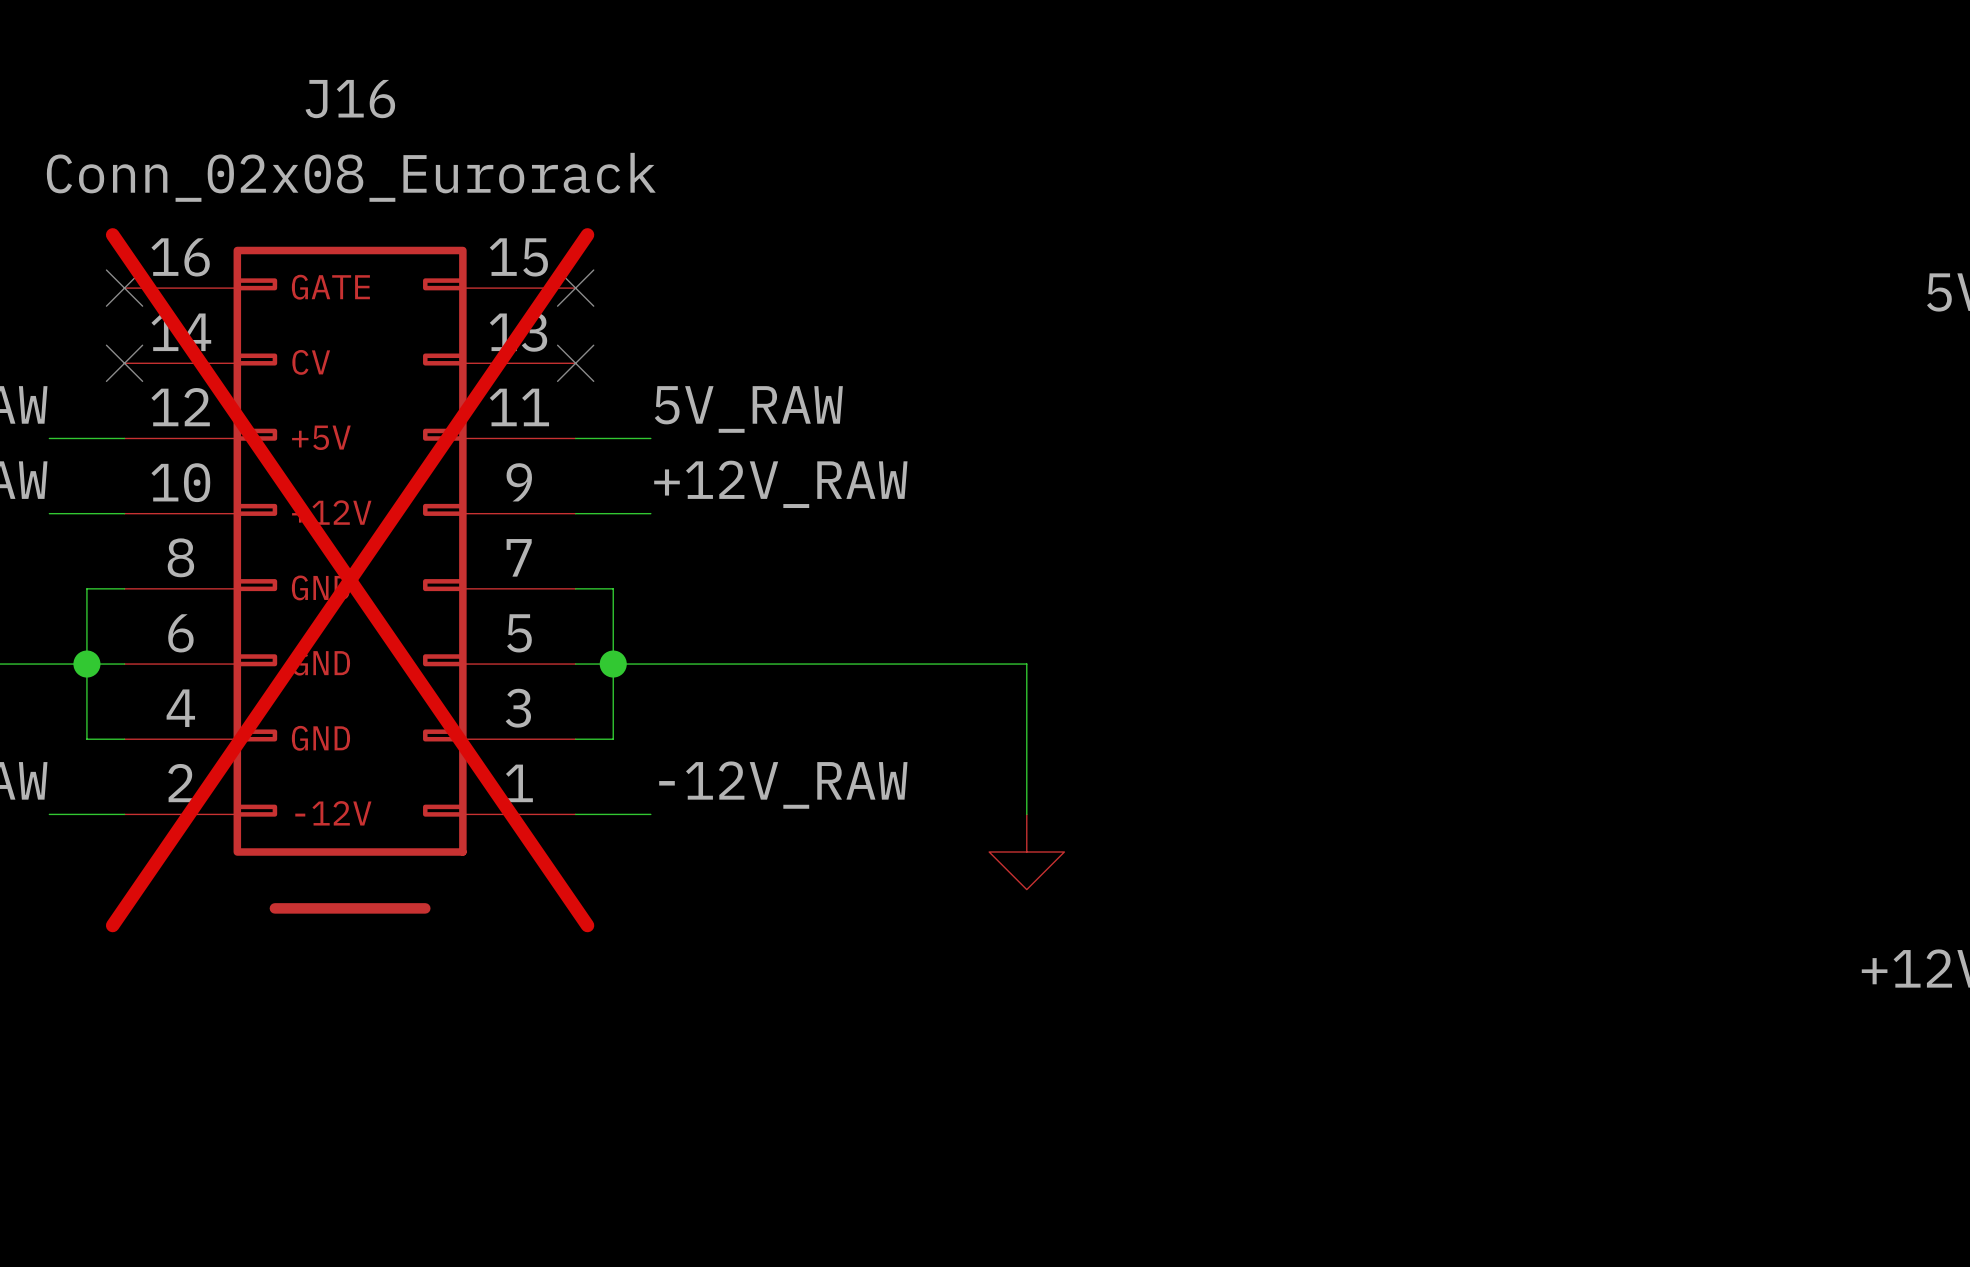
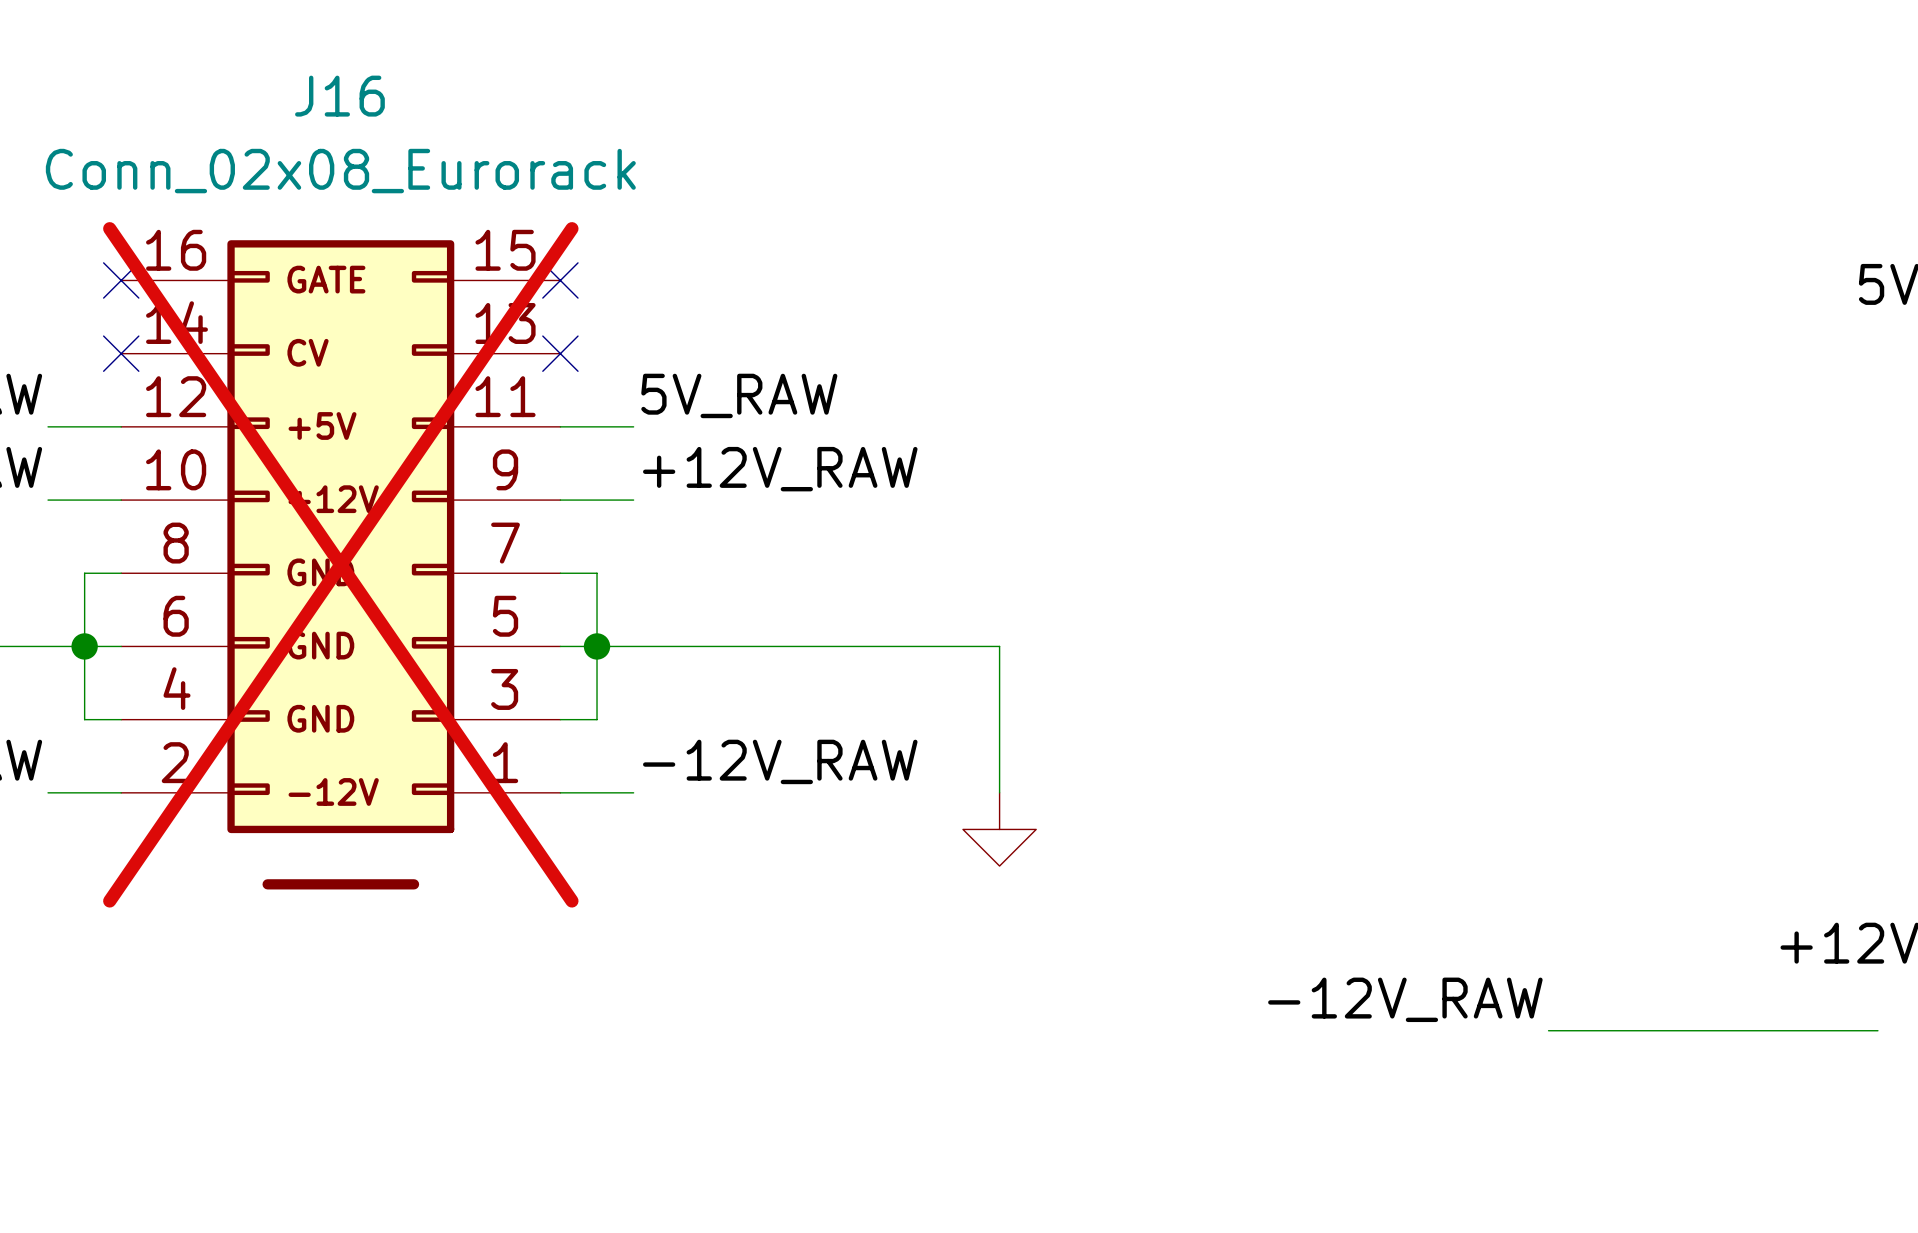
label: none -> -12V_RAW (1405, 999)
wire: none -> (1548, 1030) (1877, 1030)

